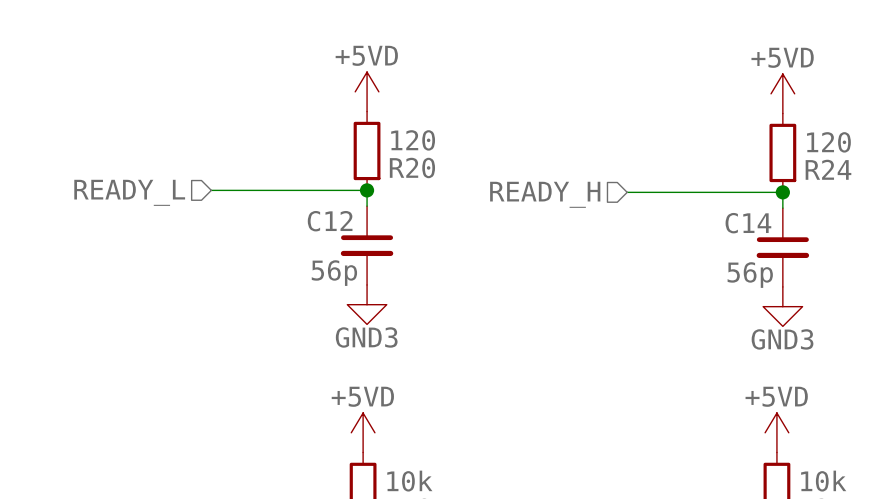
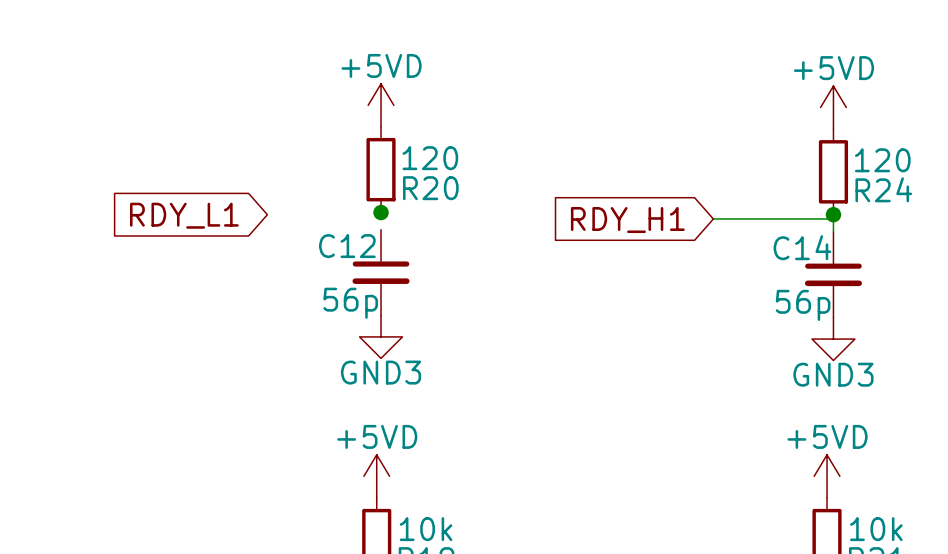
wire: (211, 190) (367, 190) (367, 206) -> none
hierarchical label: READY_L (129, 192) -> none
wire: (627, 192) (782, 192) (782, 196) -> (713, 218) (833, 218)
hierarchical label: READY_H (545, 194) -> none
global label: none -> RDY_L1 (184, 215)
global label: none -> RDY_H1 (627, 220)

